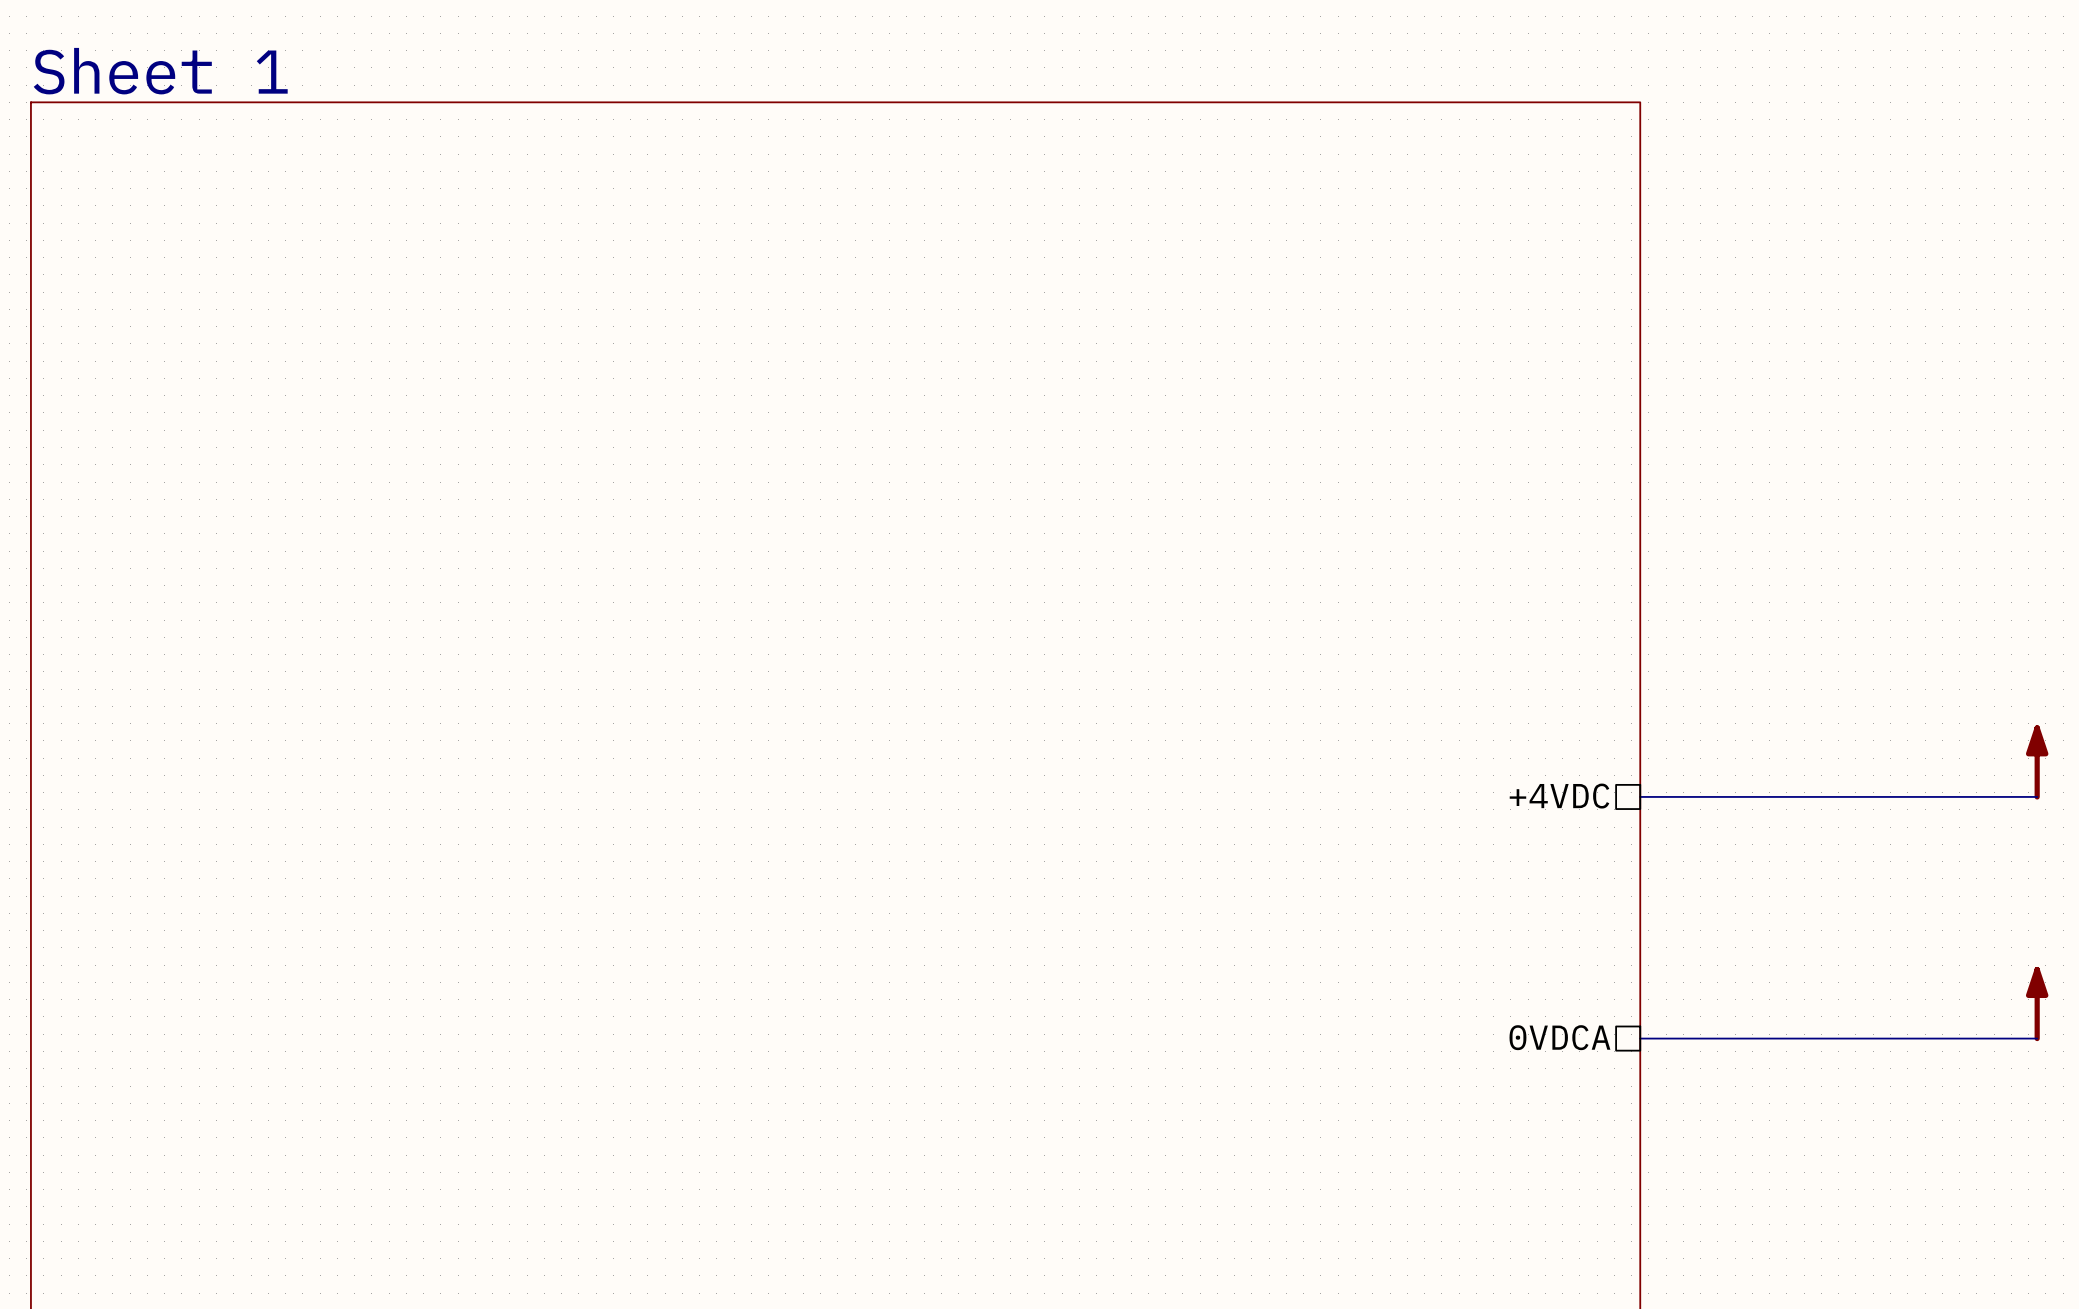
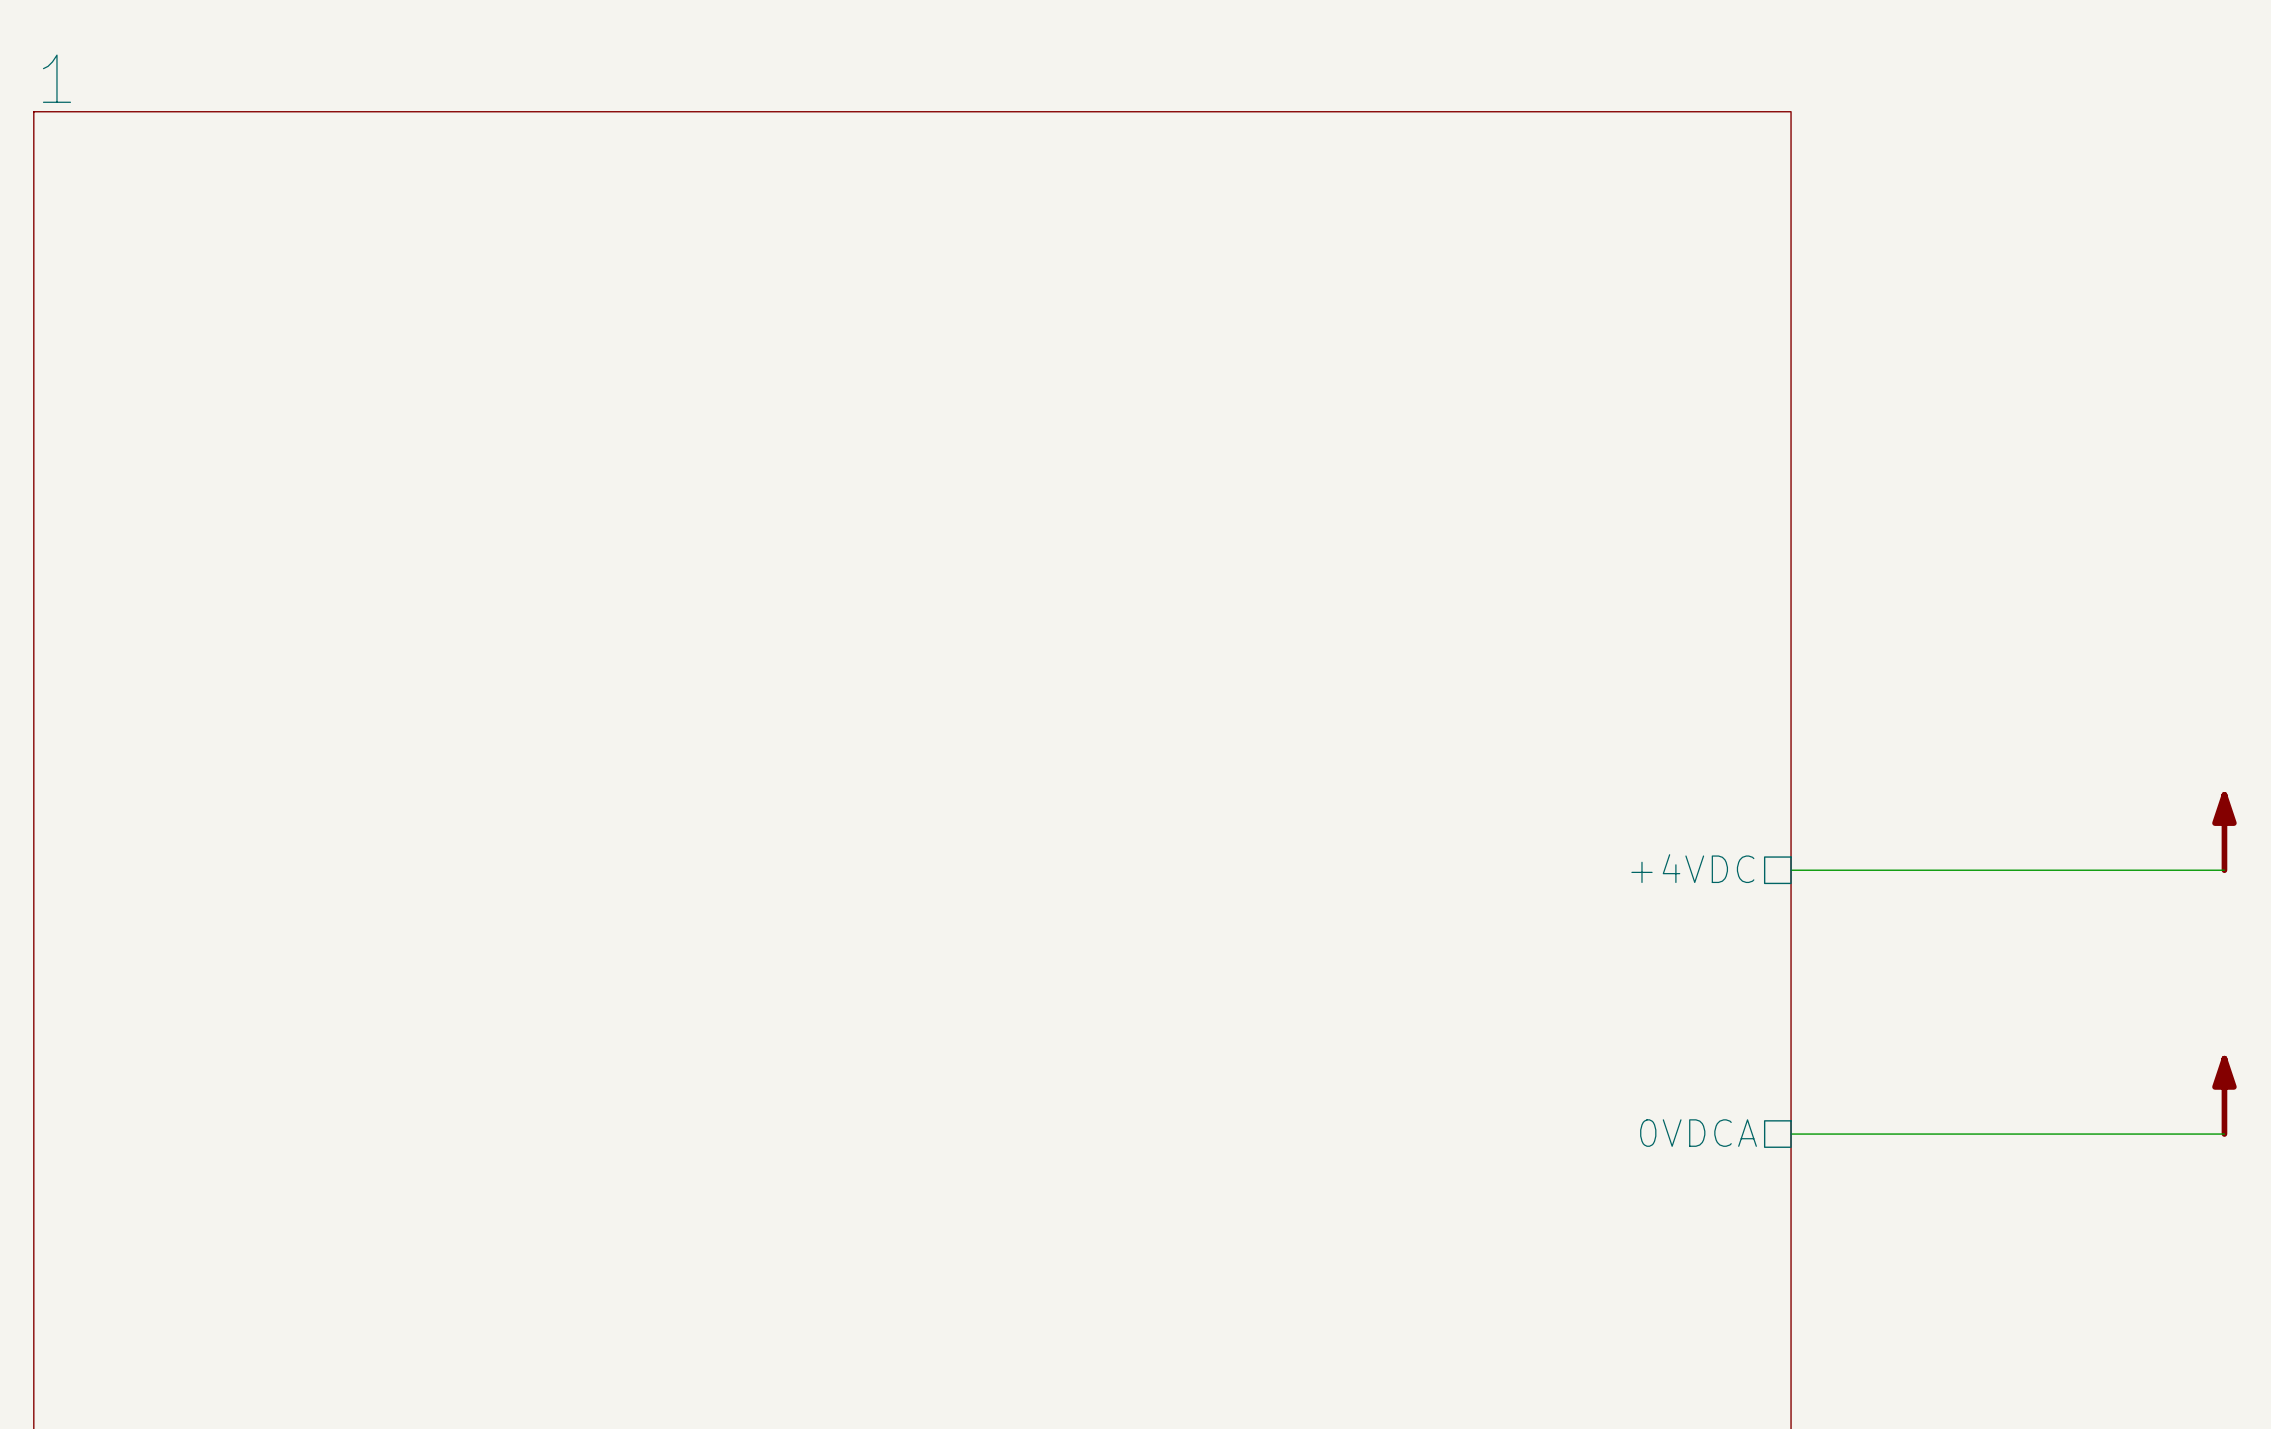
sheet Sheet 1 name: Sheet 1 (160, 71) -> 1 (56, 78)

